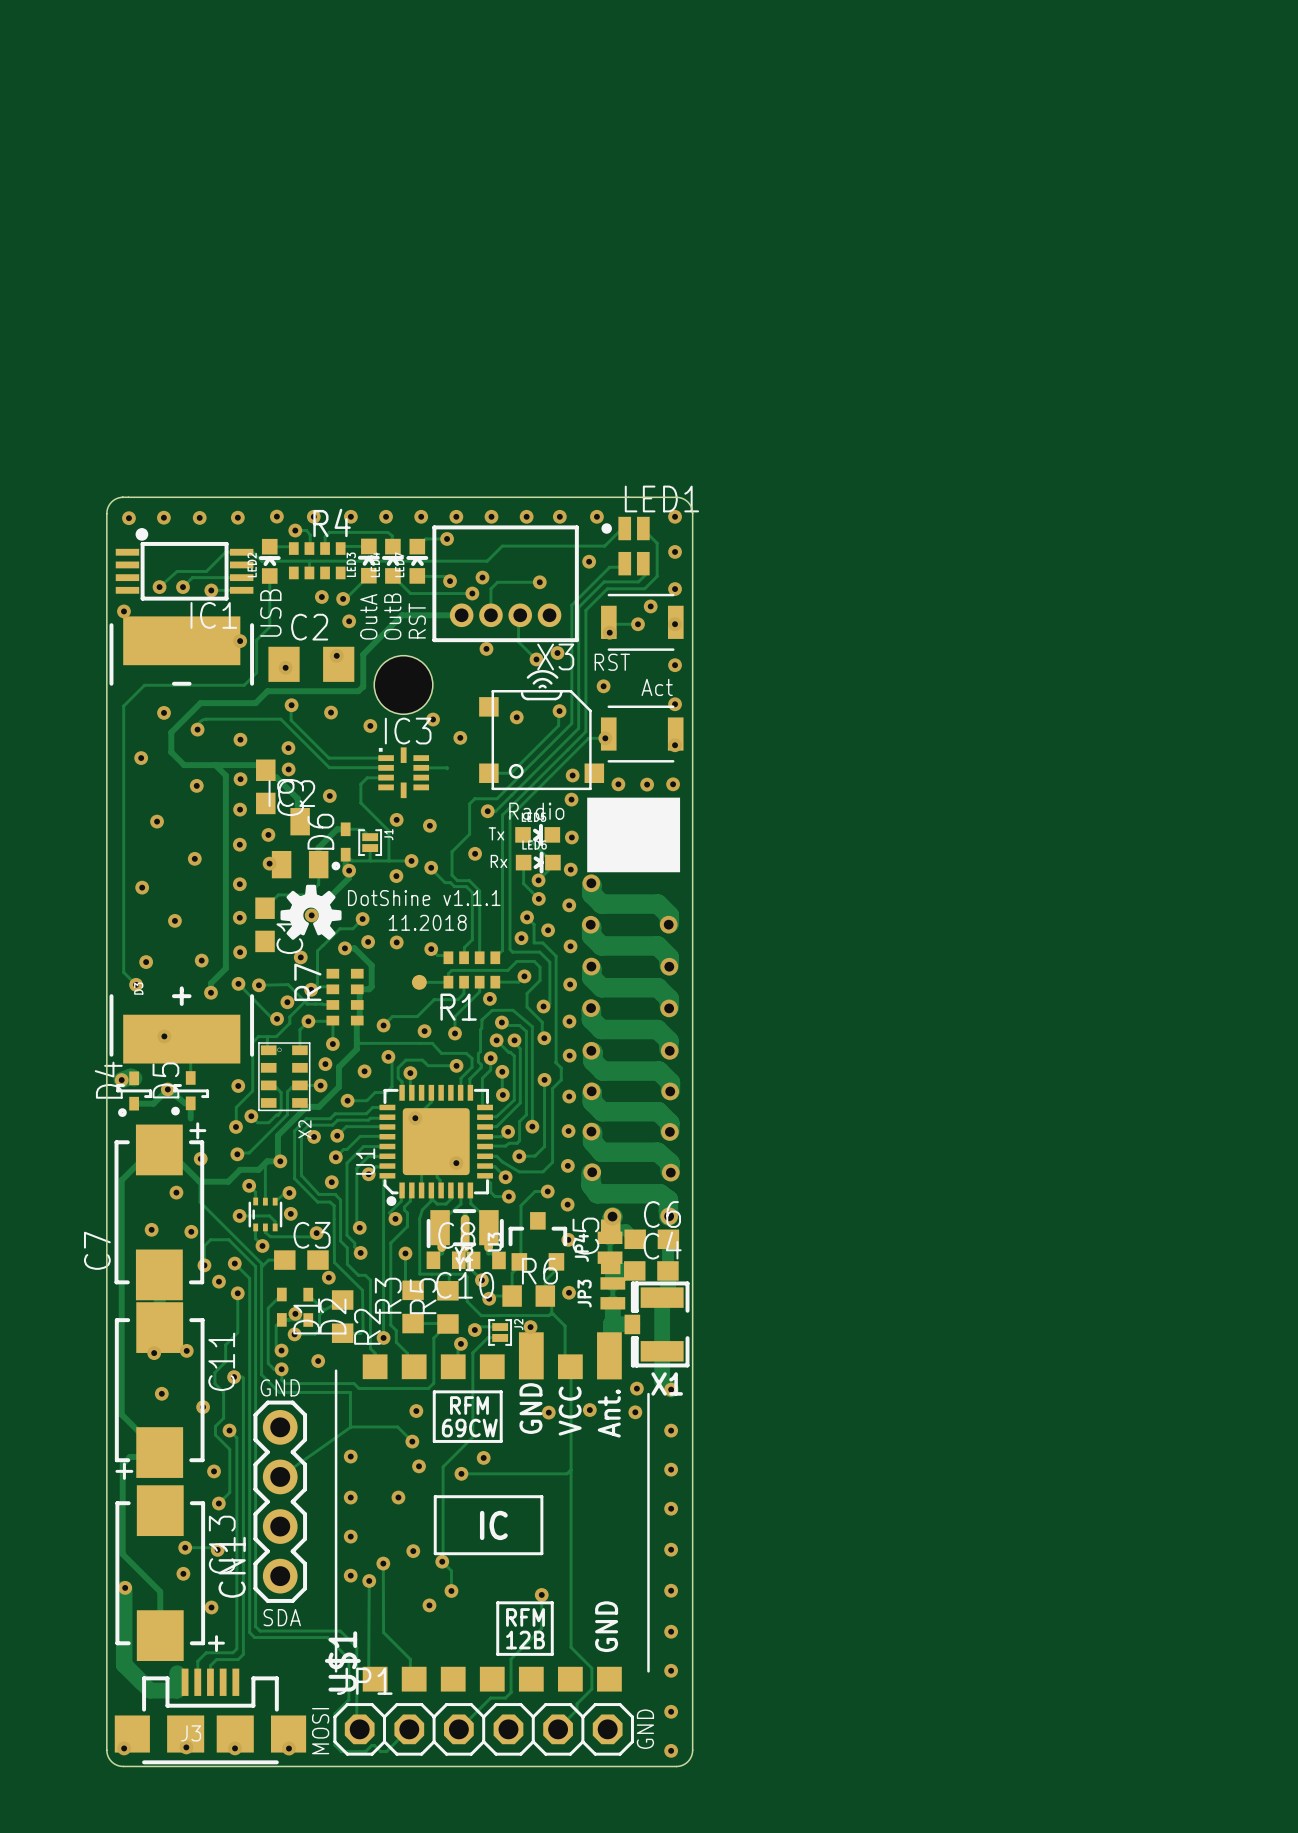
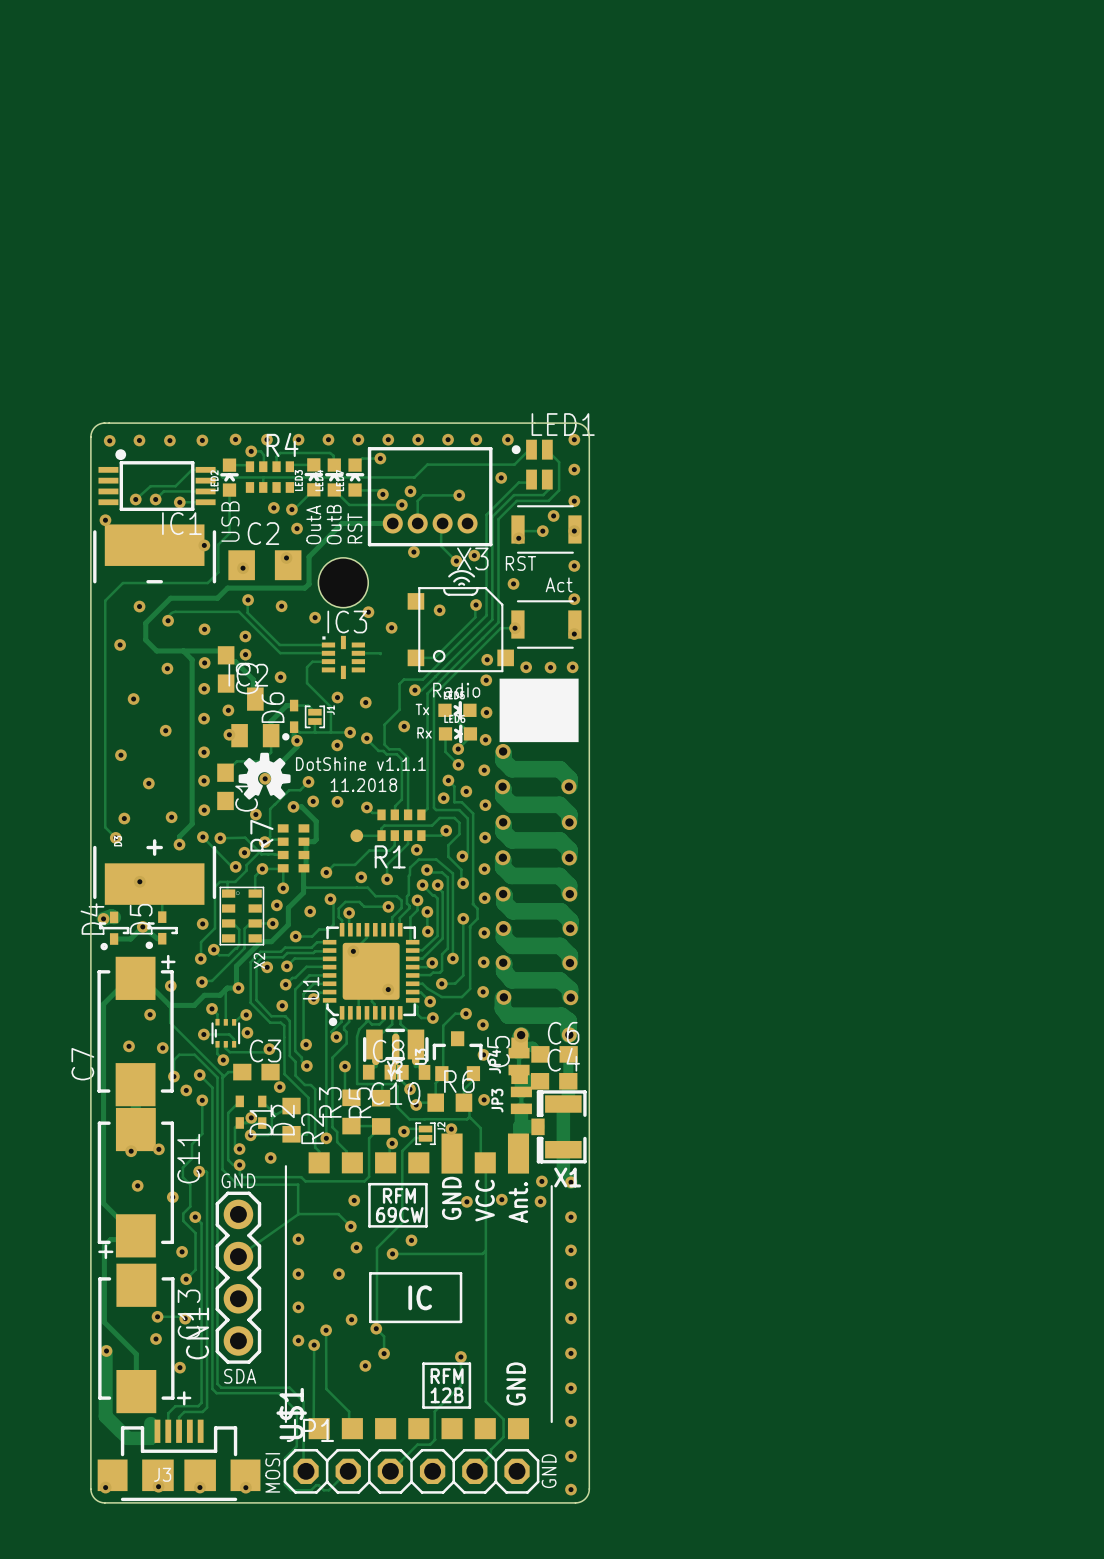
track: (190, 1103) (190, 1118) -> none

